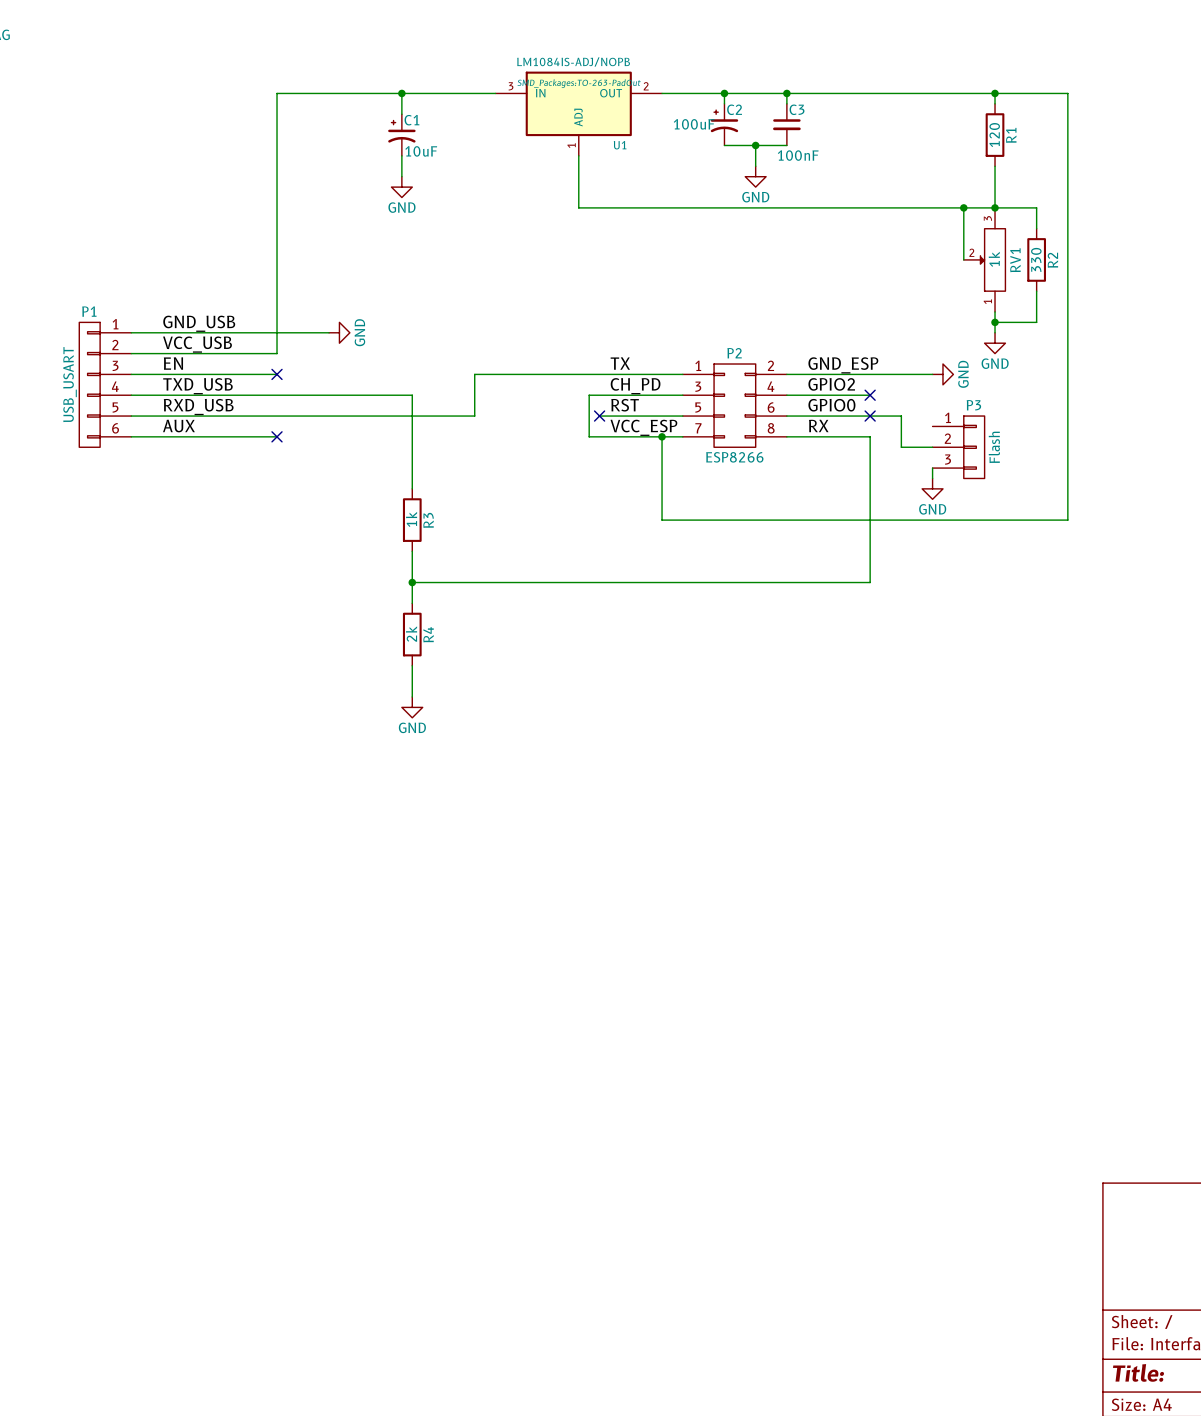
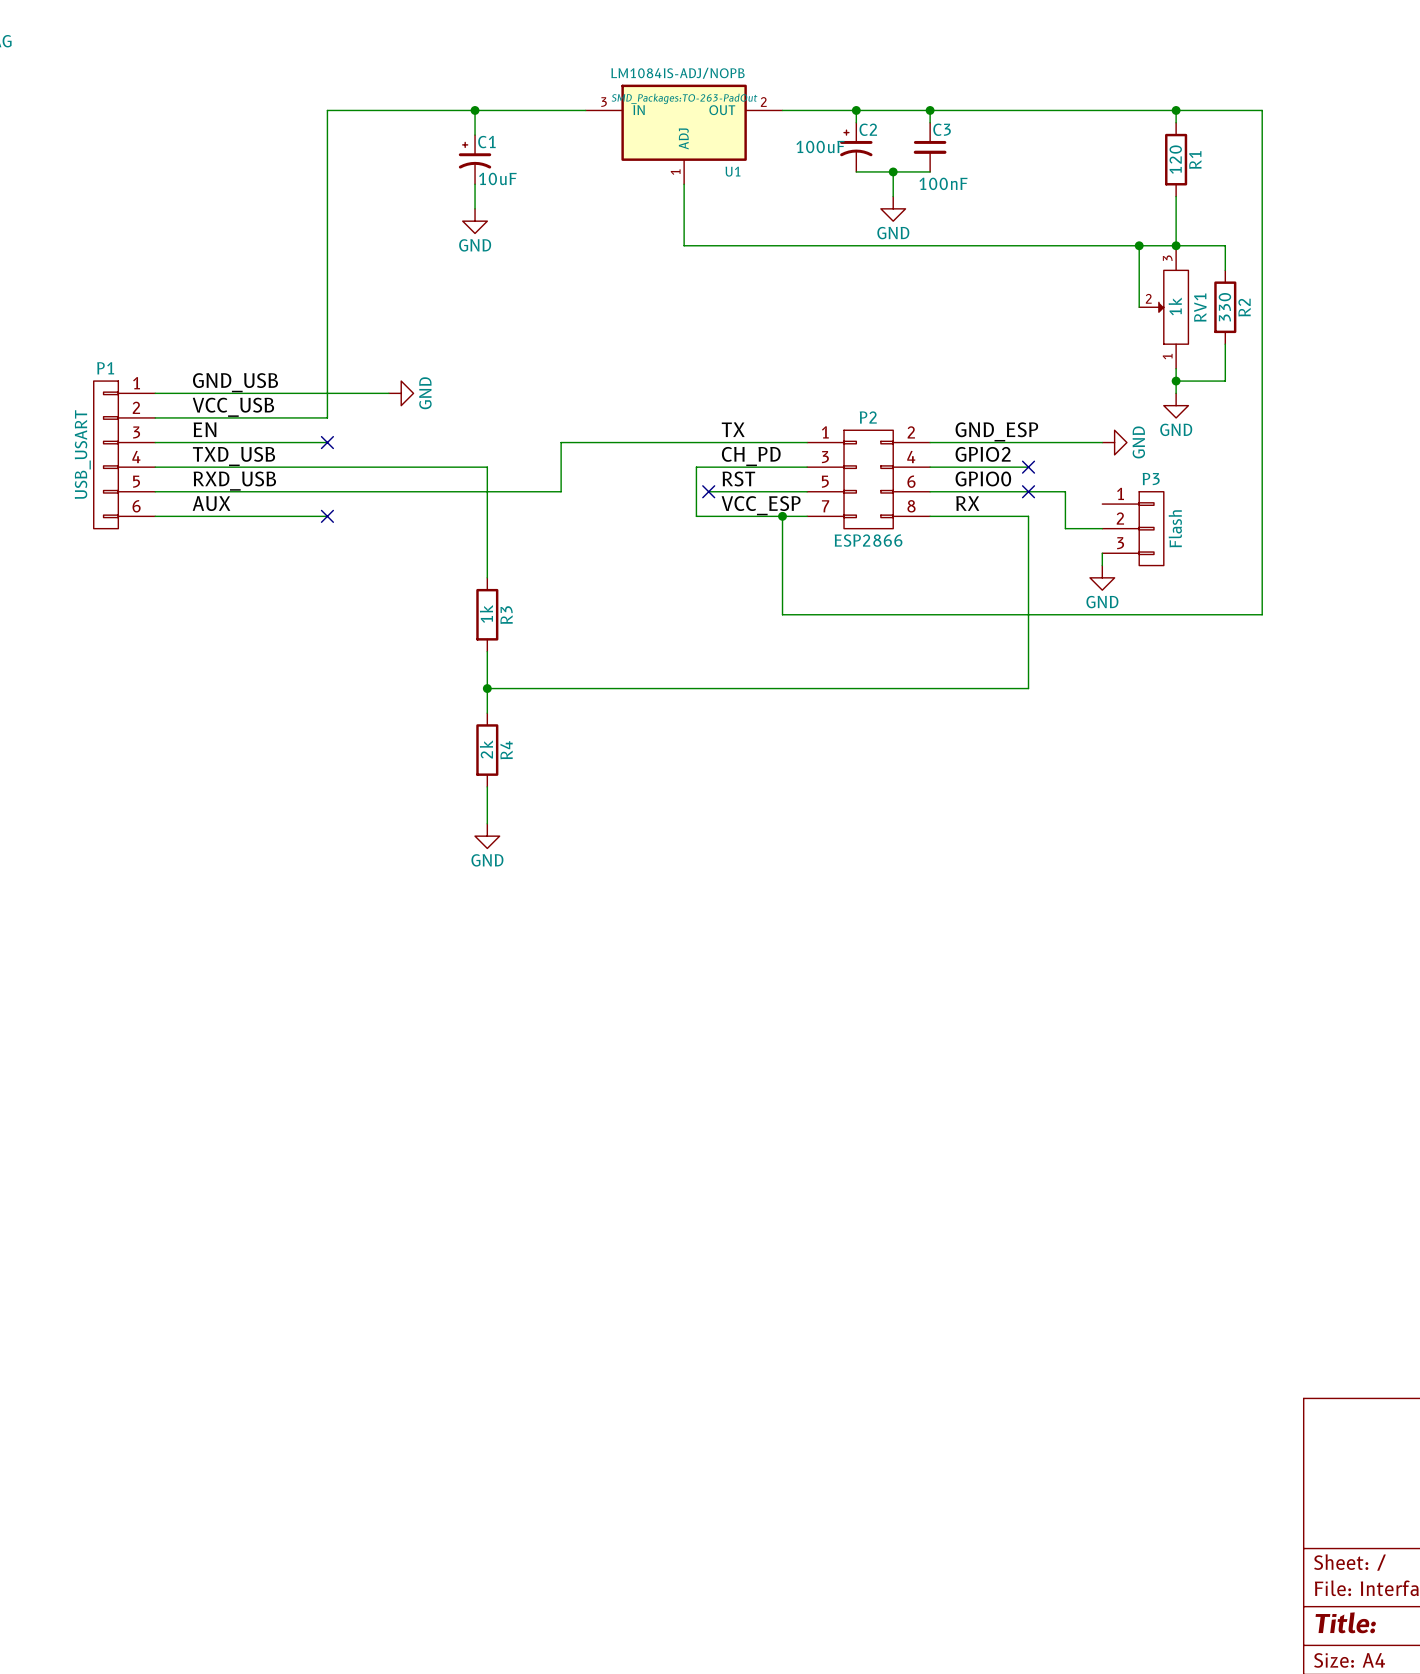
P2 value: ESP8266 (734, 457) -> ESP2866 (868, 540)

